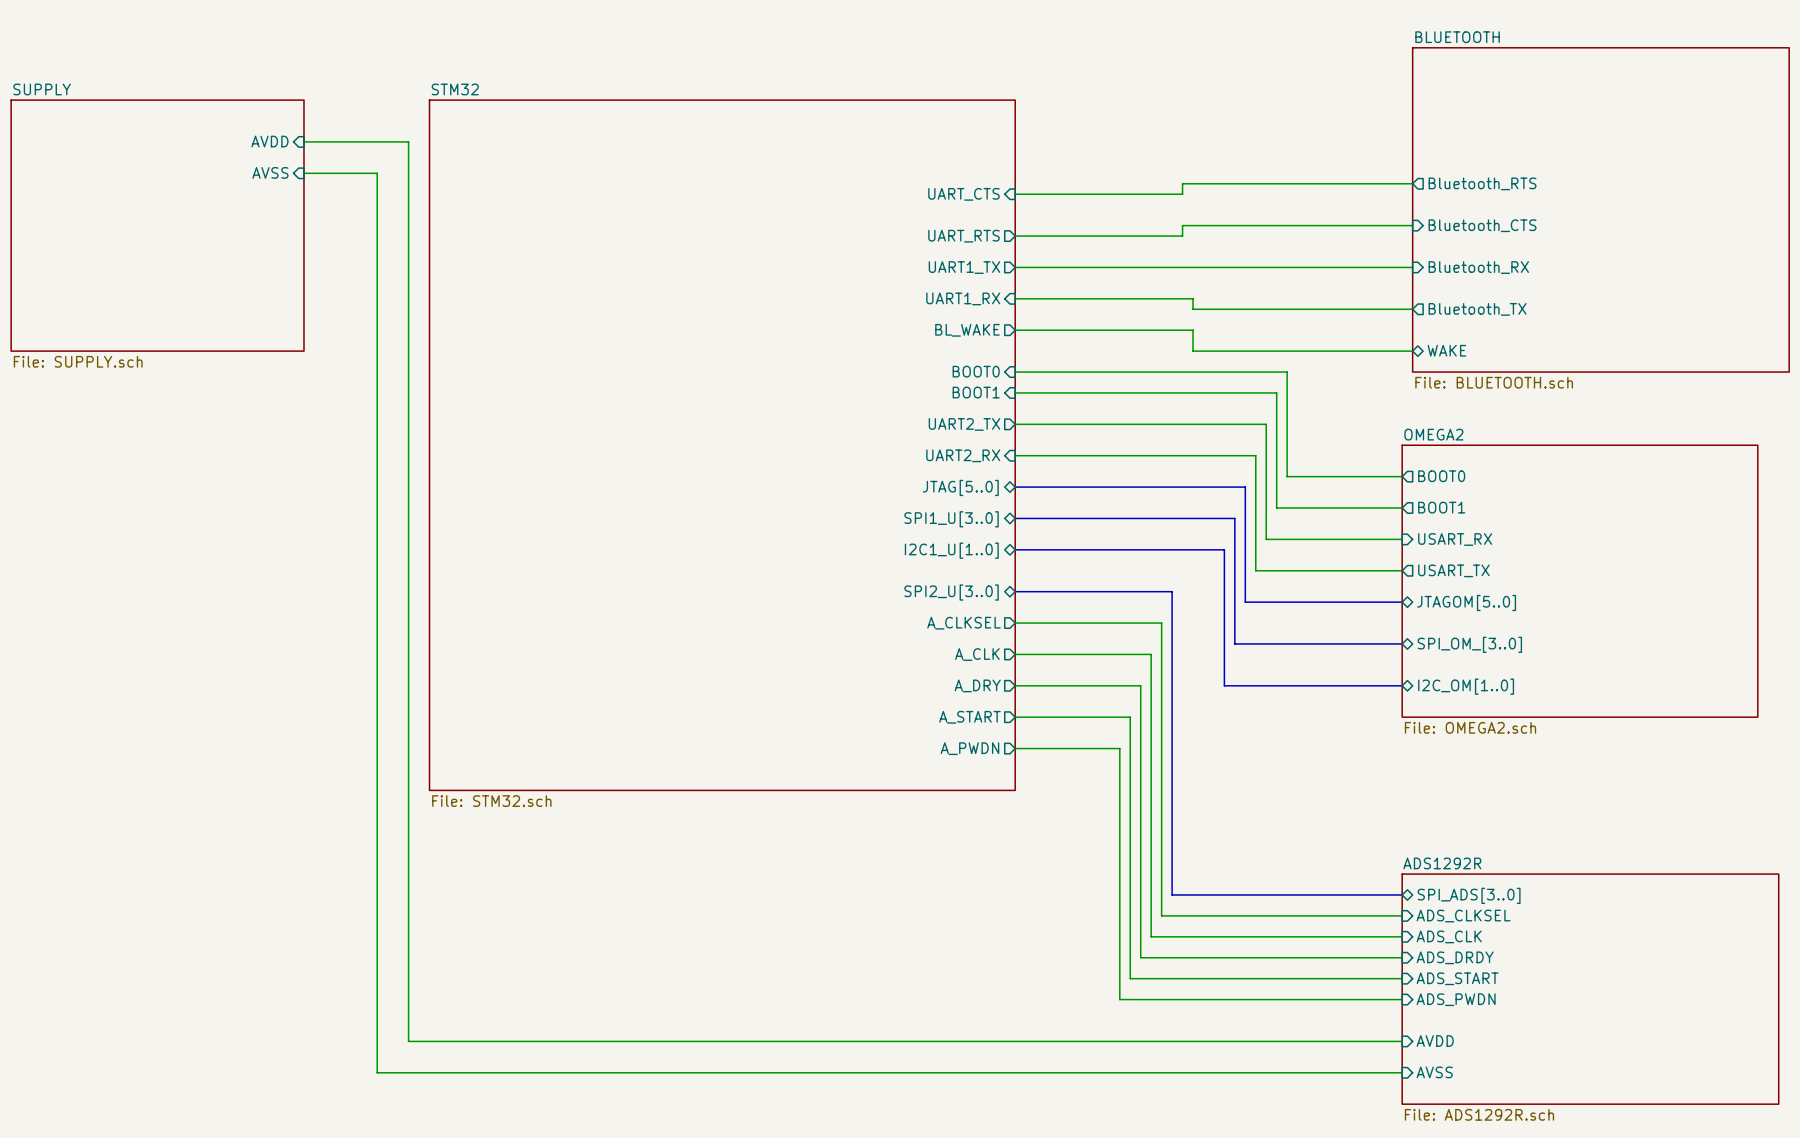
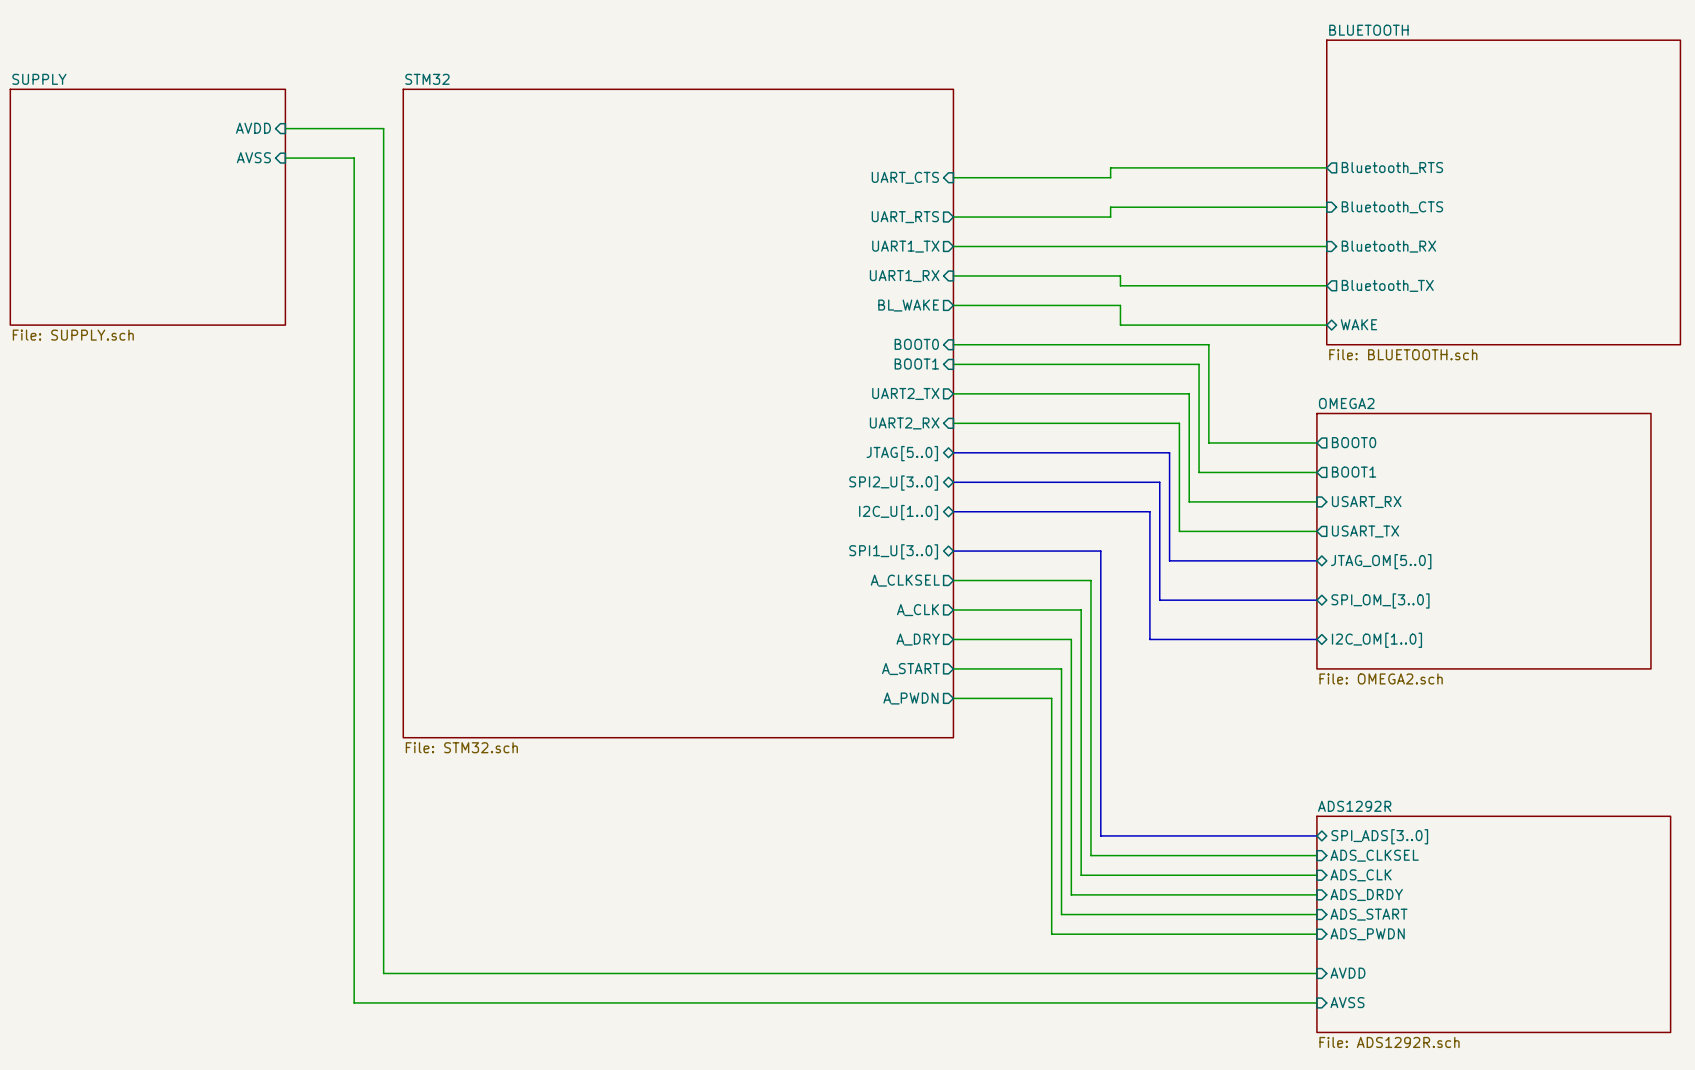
sheet pin: SPI1_U[3..0] (951, 519) -> SPI2_U[3..0] (893, 483)
sheet pin: I2C1_U[1..0] (951, 550) -> I2C_U[1..0] (898, 512)
sheet pin: SPI2_U[3..0] (951, 592) -> SPI1_U[3..0] (893, 551)
sheet pin: JTAGOM[5..0] (1466, 602) -> JTAG_OM[5..0] (1381, 561)

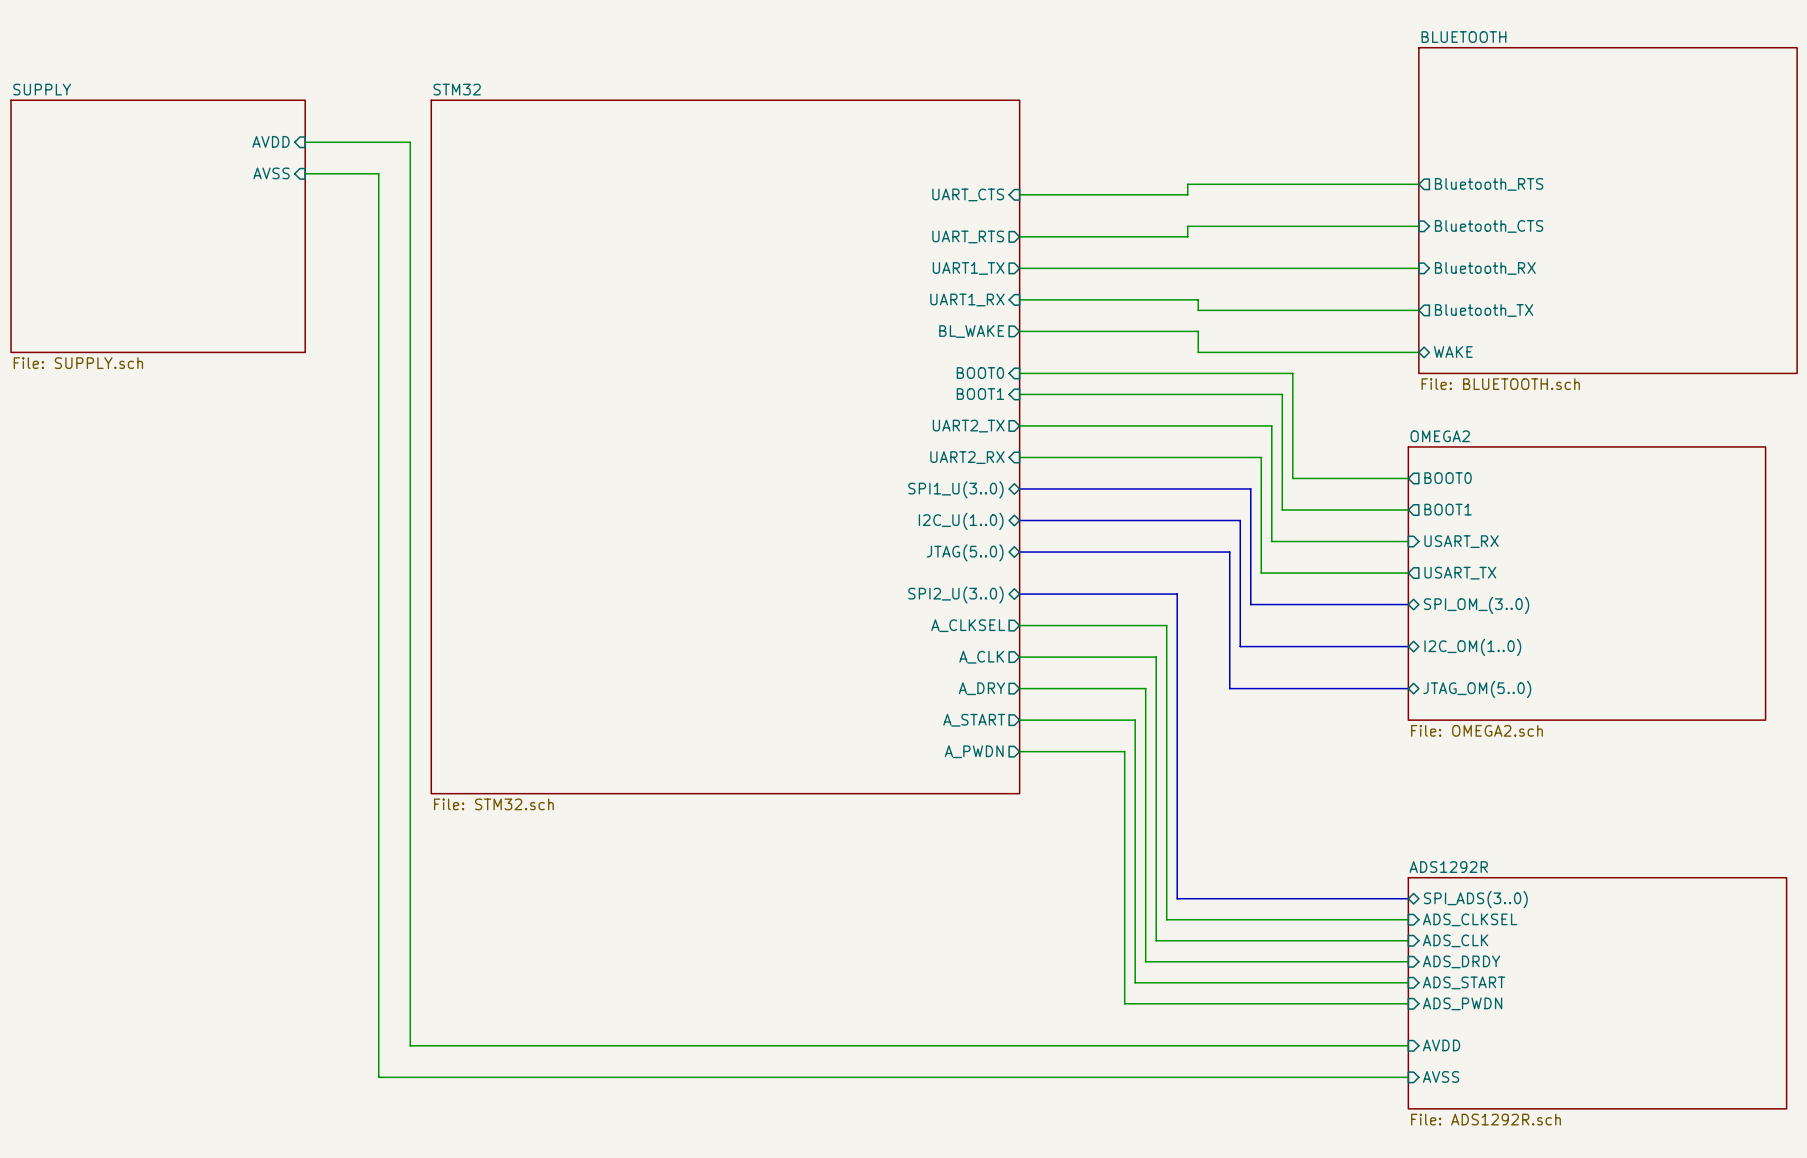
sheet pin: JTAG[5..0] (902, 453) -> SPI1_U(3..0) (955, 489)
sheet pin: SPI2_U[3..0] (893, 483) -> I2C_U(1..0) (961, 521)
sheet pin: I2C_U[1..0] (898, 512) -> JTAG(5..0) (965, 552)
sheet pin: SPI1_U[3..0] (893, 551) -> SPI2_U(3..0) (955, 594)
sheet pin: JTAG_OM[5..0] (1381, 561) -> SPI_OM_(3..0) (1476, 605)
sheet pin: SPI_OM_[3..0] (1380, 600) -> I2C_OM(1..0) (1472, 647)
sheet pin: I2C_OM[1..0] (1376, 640) -> JTAG_OM(5..0) (1477, 689)
sheet pin: SPI_ADS[3..0] (1379, 836) -> SPI_ADS(3..0) (1475, 899)

